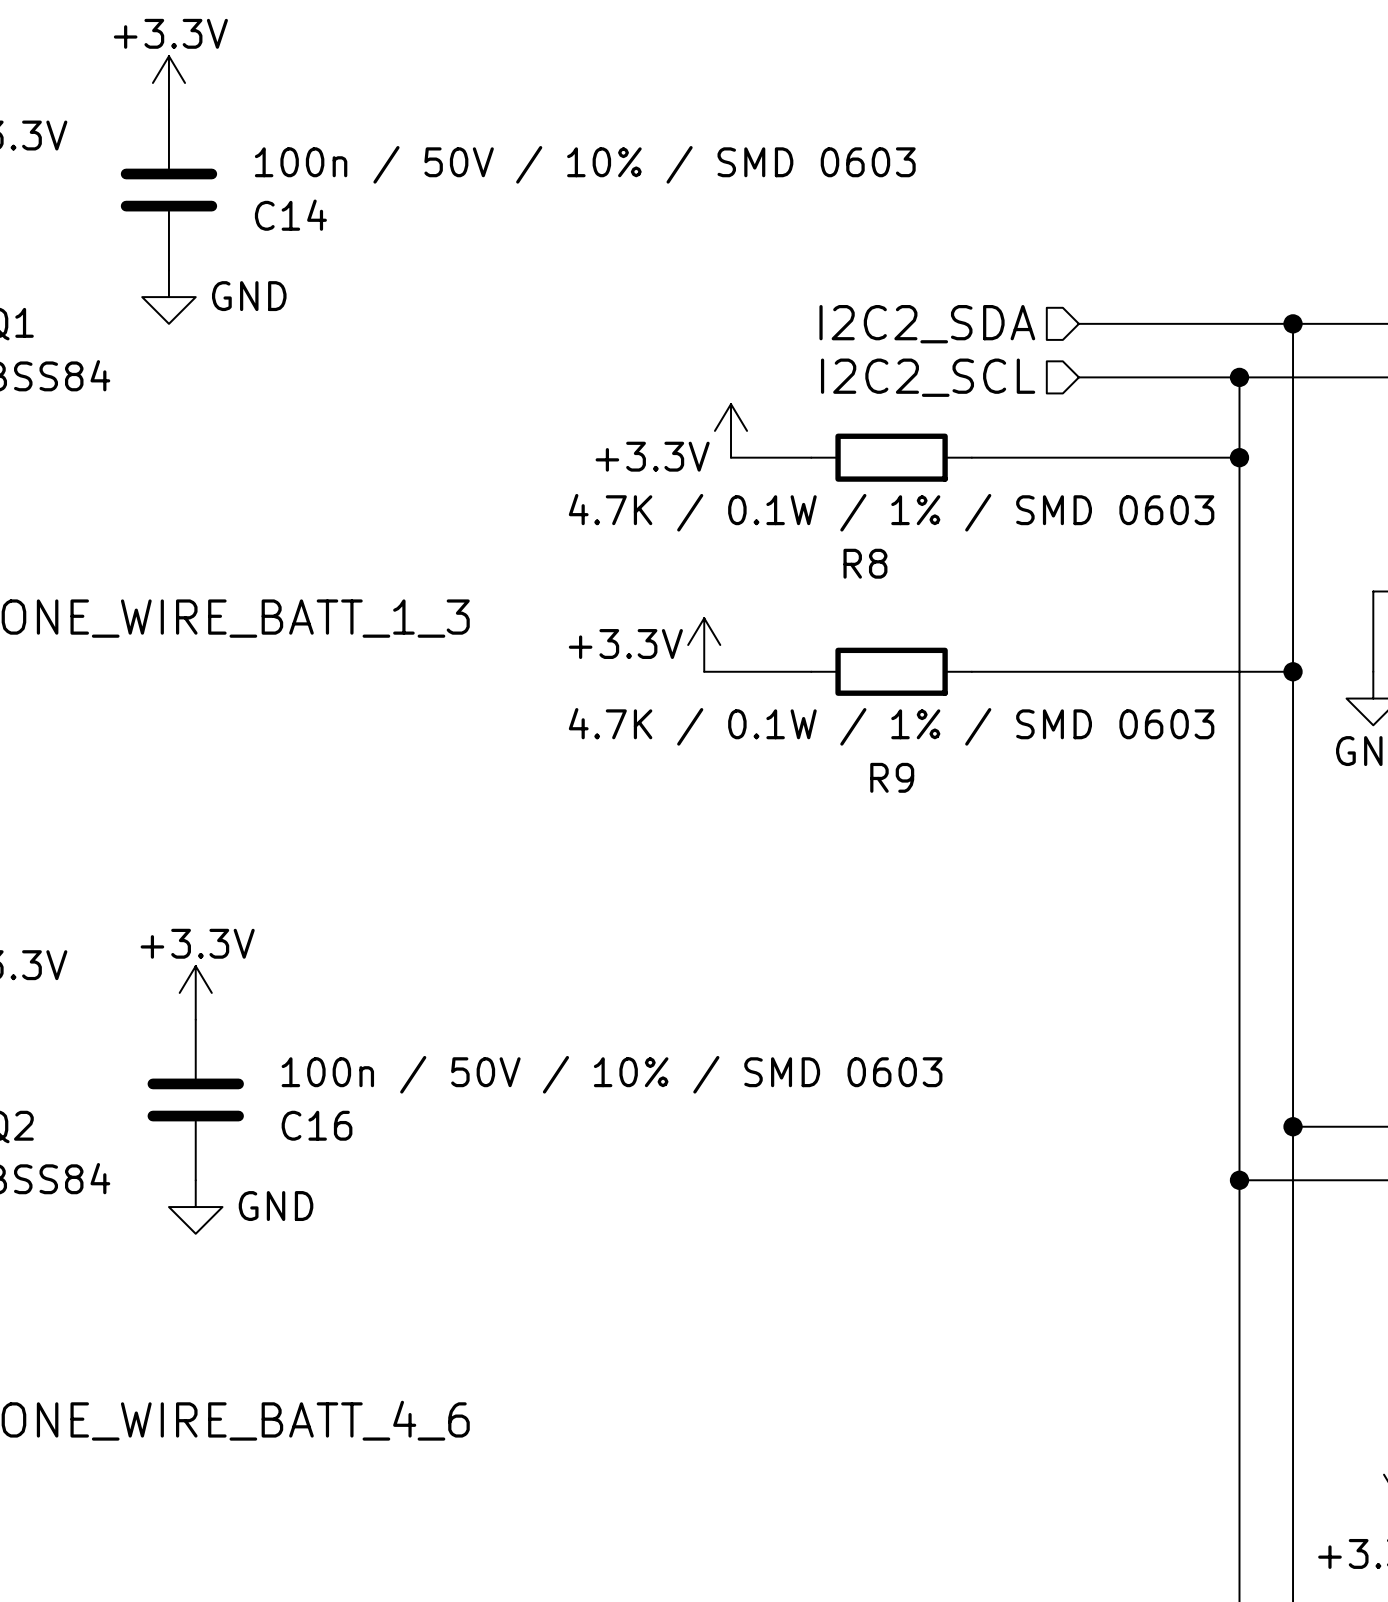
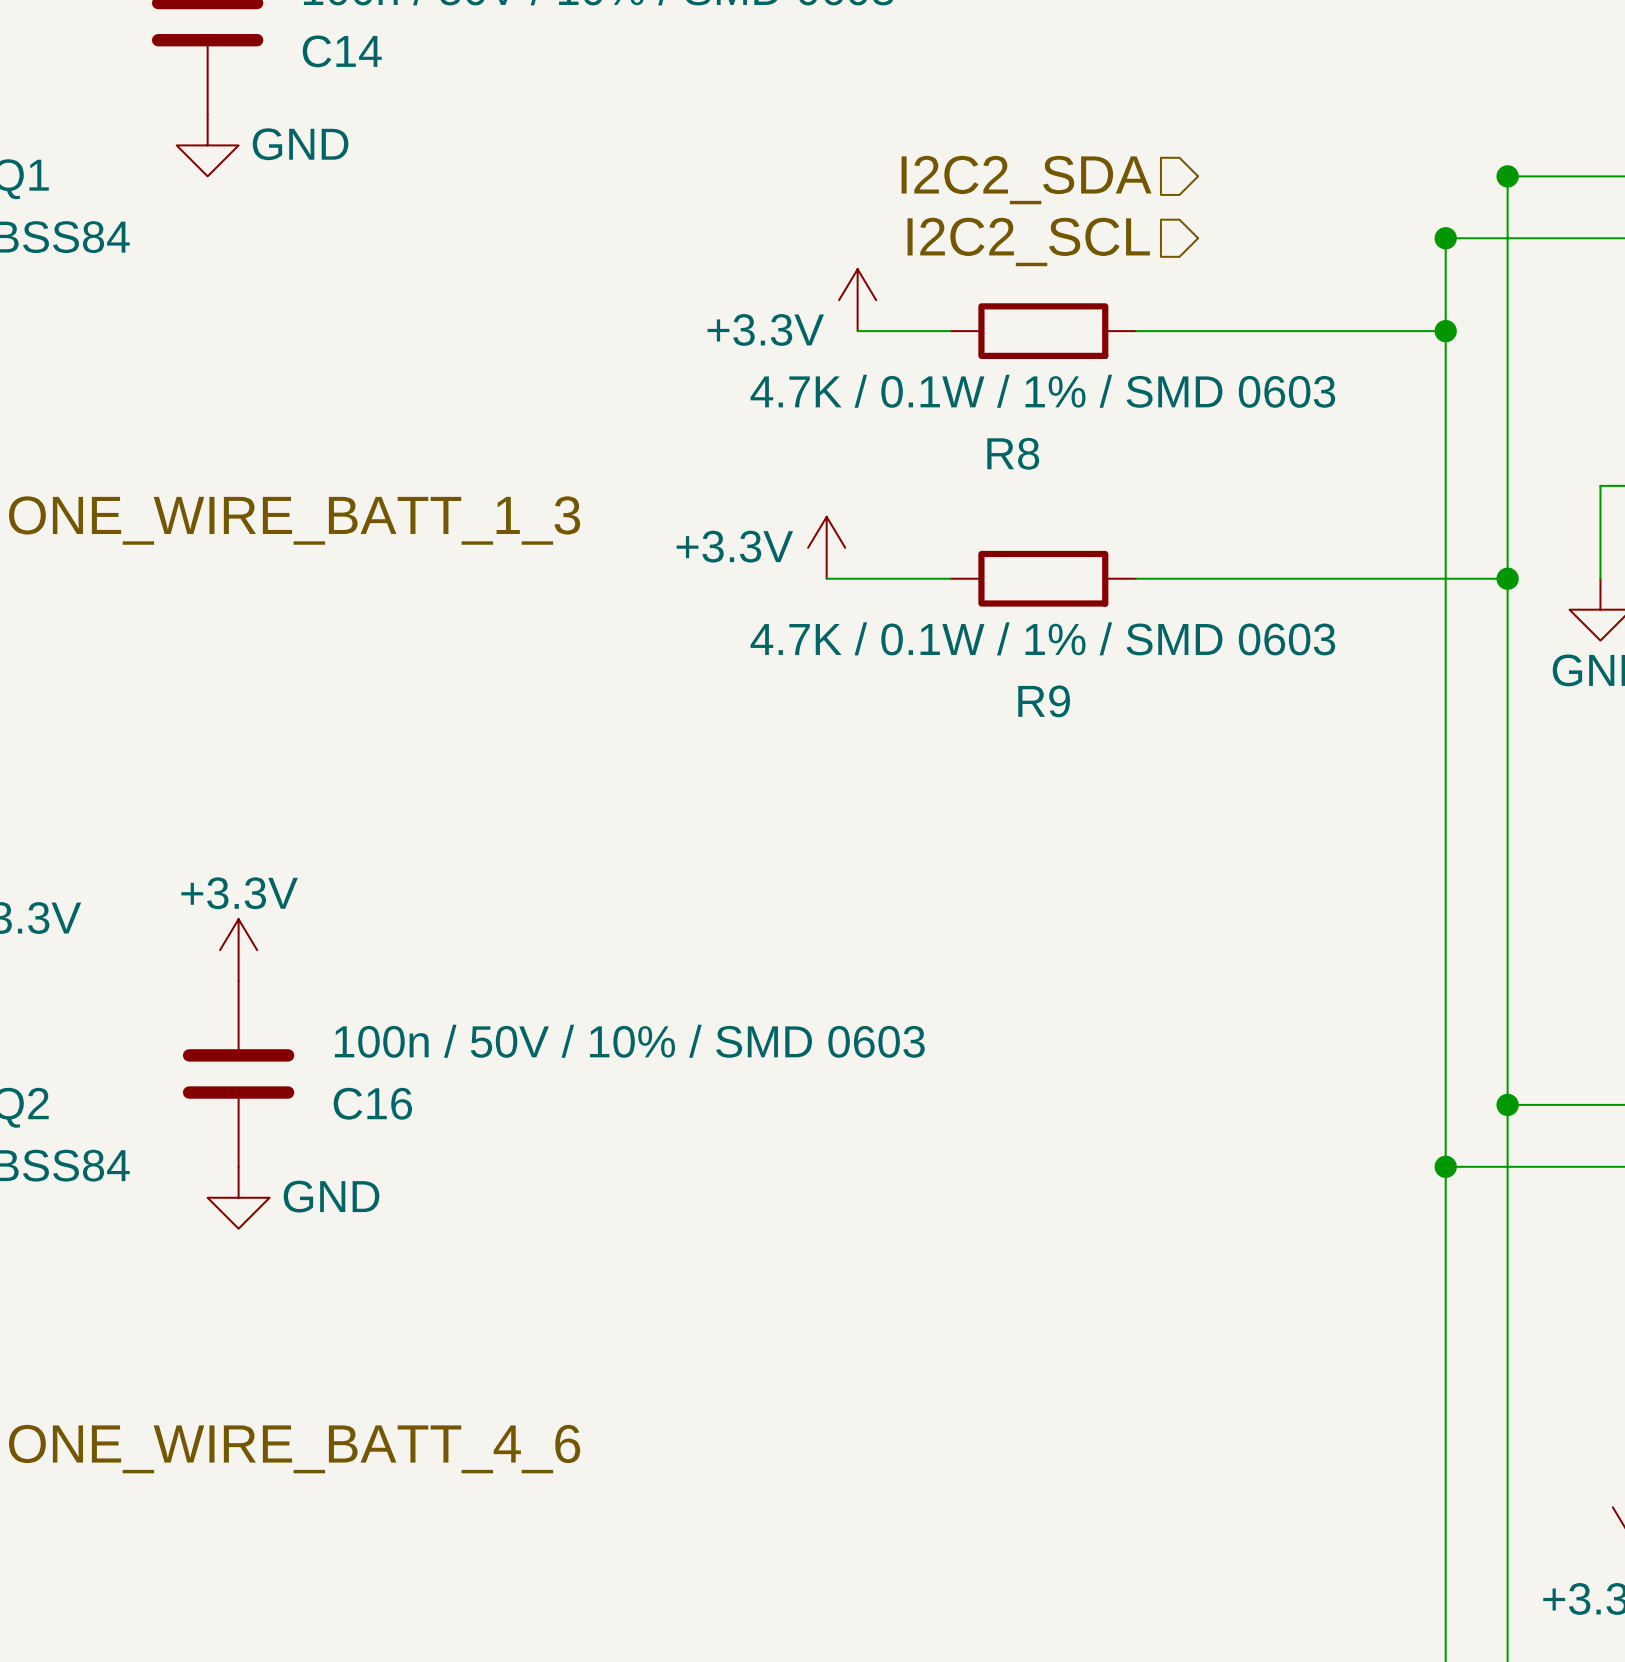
wire: (1078, 323) (1293, 323) -> none
hierarchical label position: I2C2_SDA (927, 324) -> I2C2_SDA (1026, 180)
hierarchical label position: I2C2_SCL (928, 377) -> I2C2_SCL (1028, 241)
wire: (1078, 377) (1239, 377) -> none

